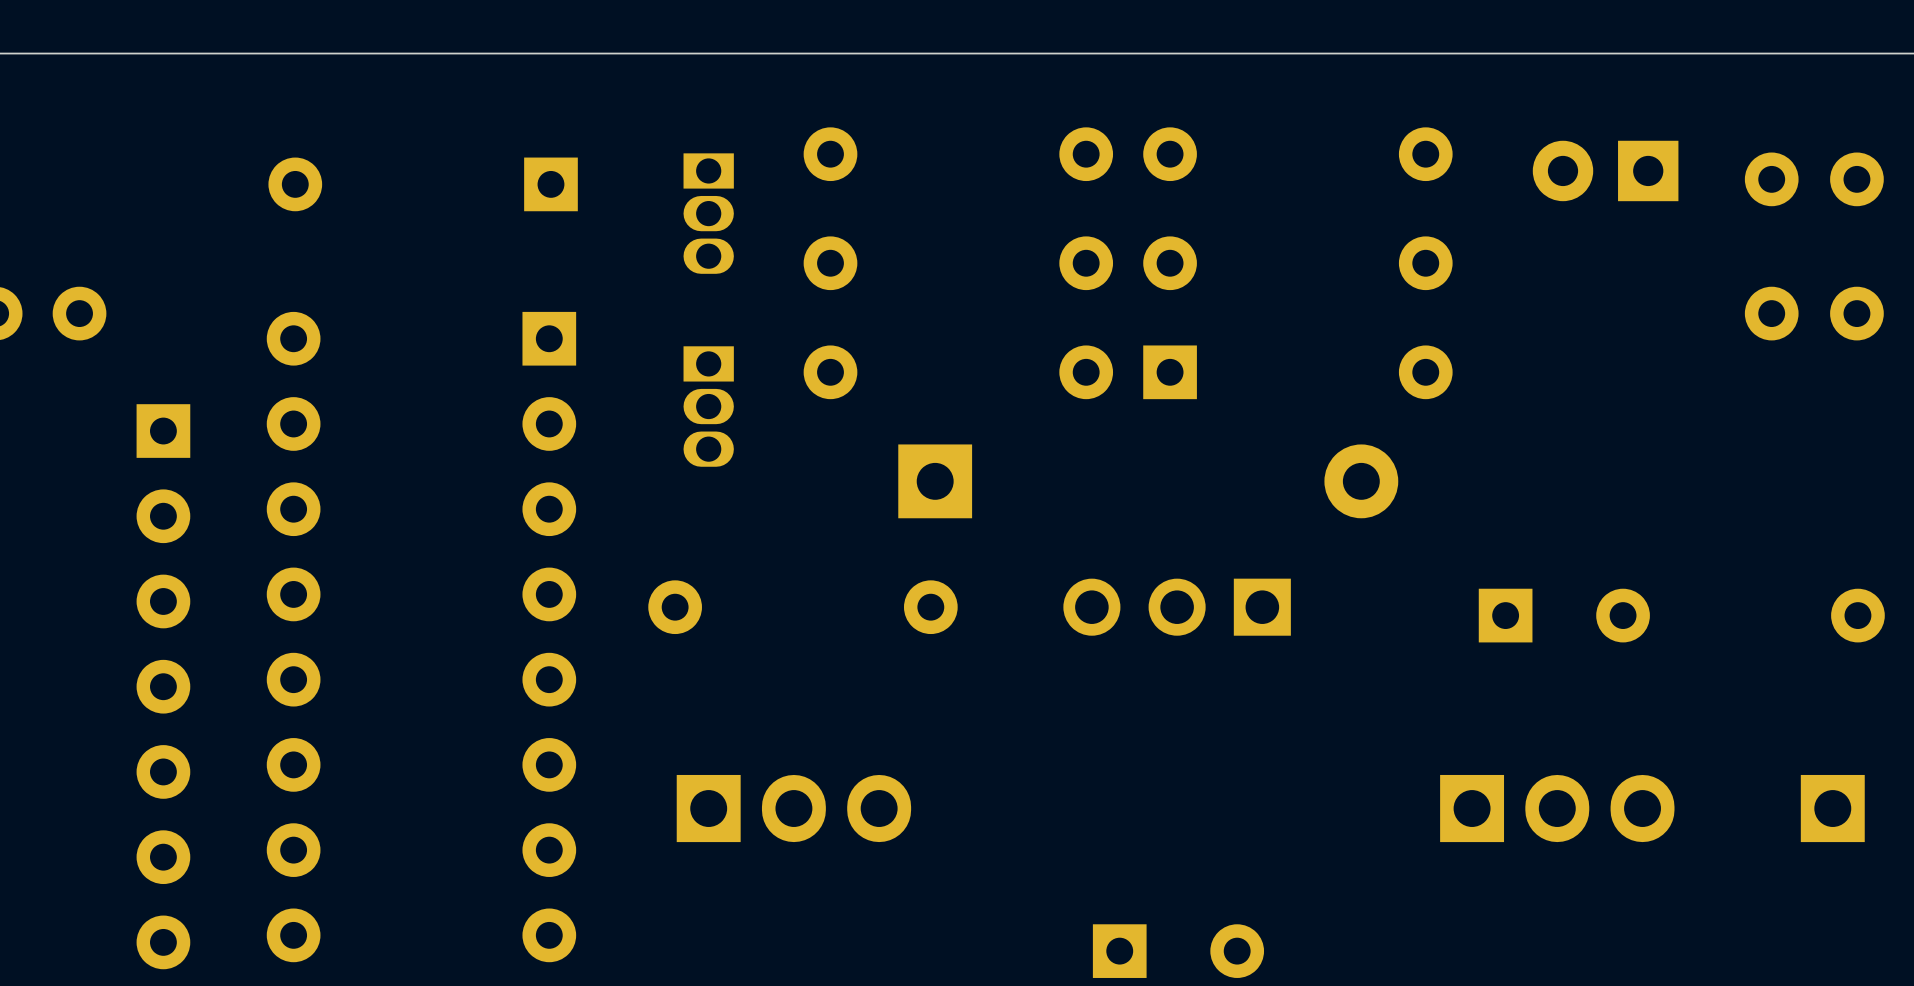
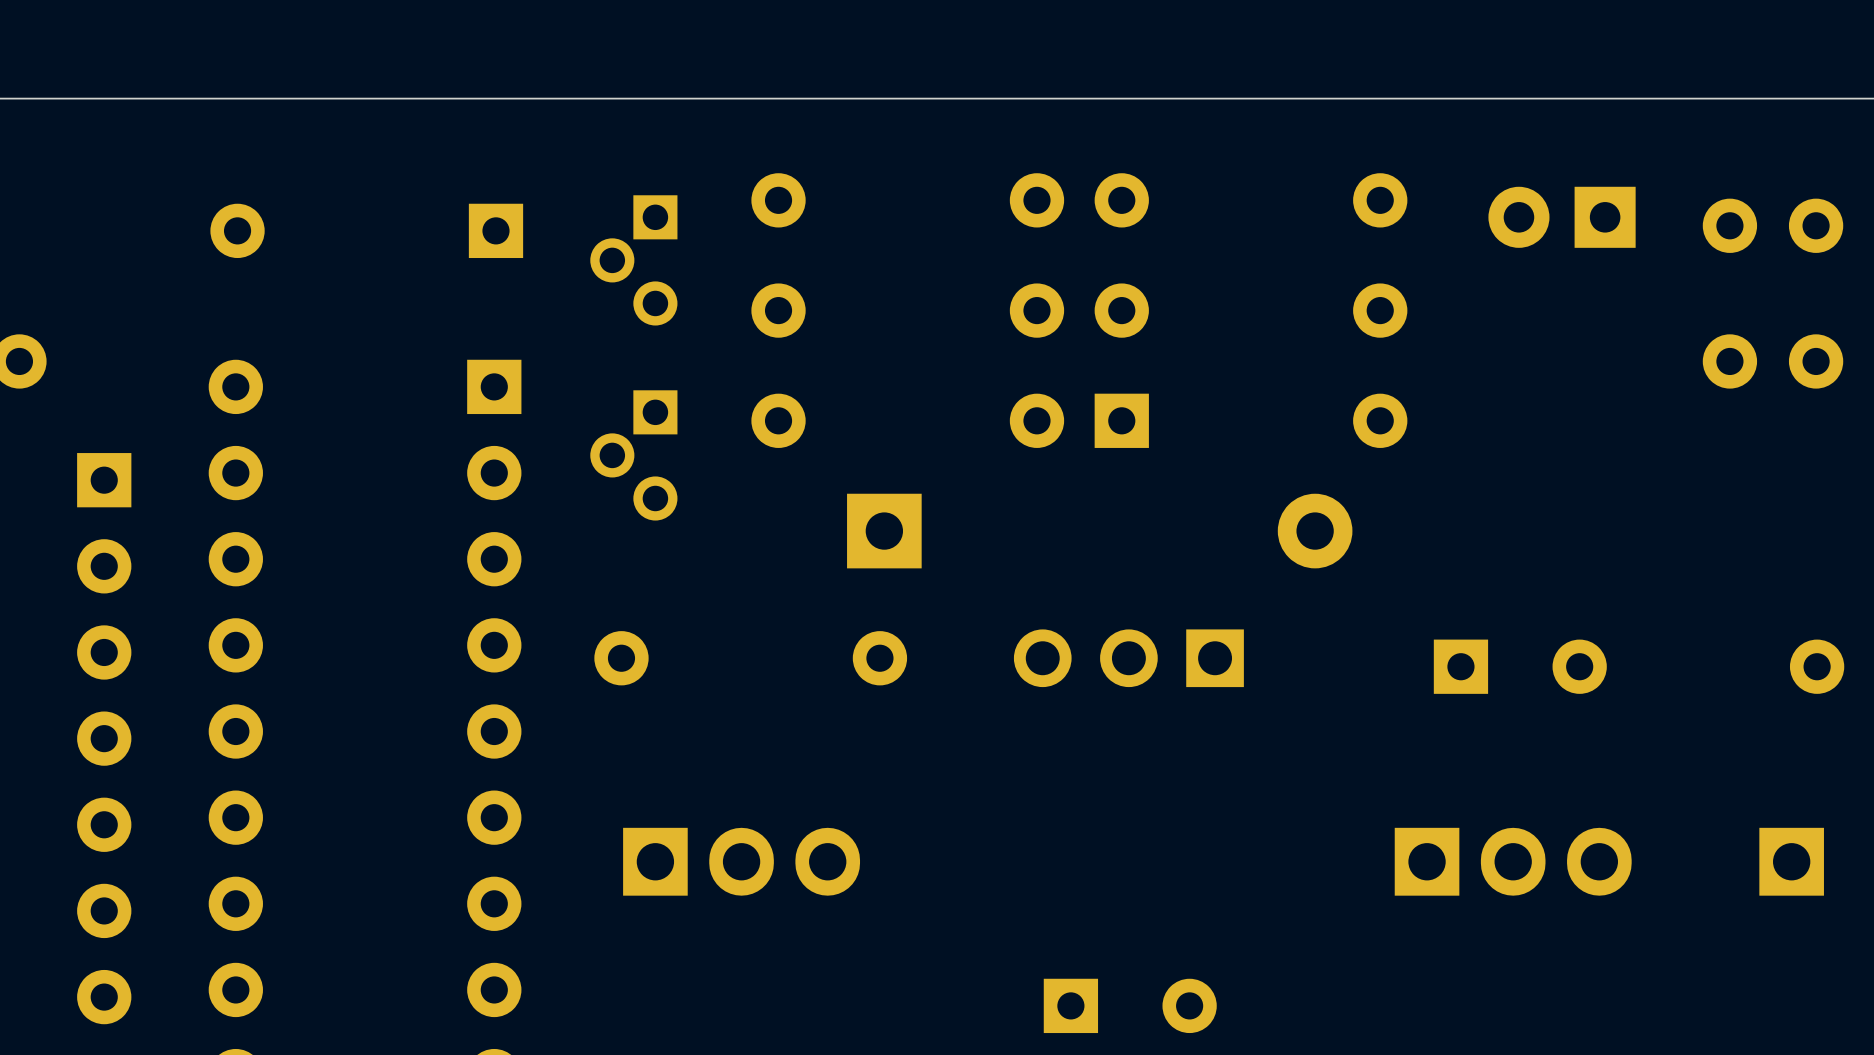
part footprint: [683, 153, 734, 274] -> [590, 195, 678, 326]
part footprint: [683, 346, 734, 467] -> [590, 390, 678, 521]

